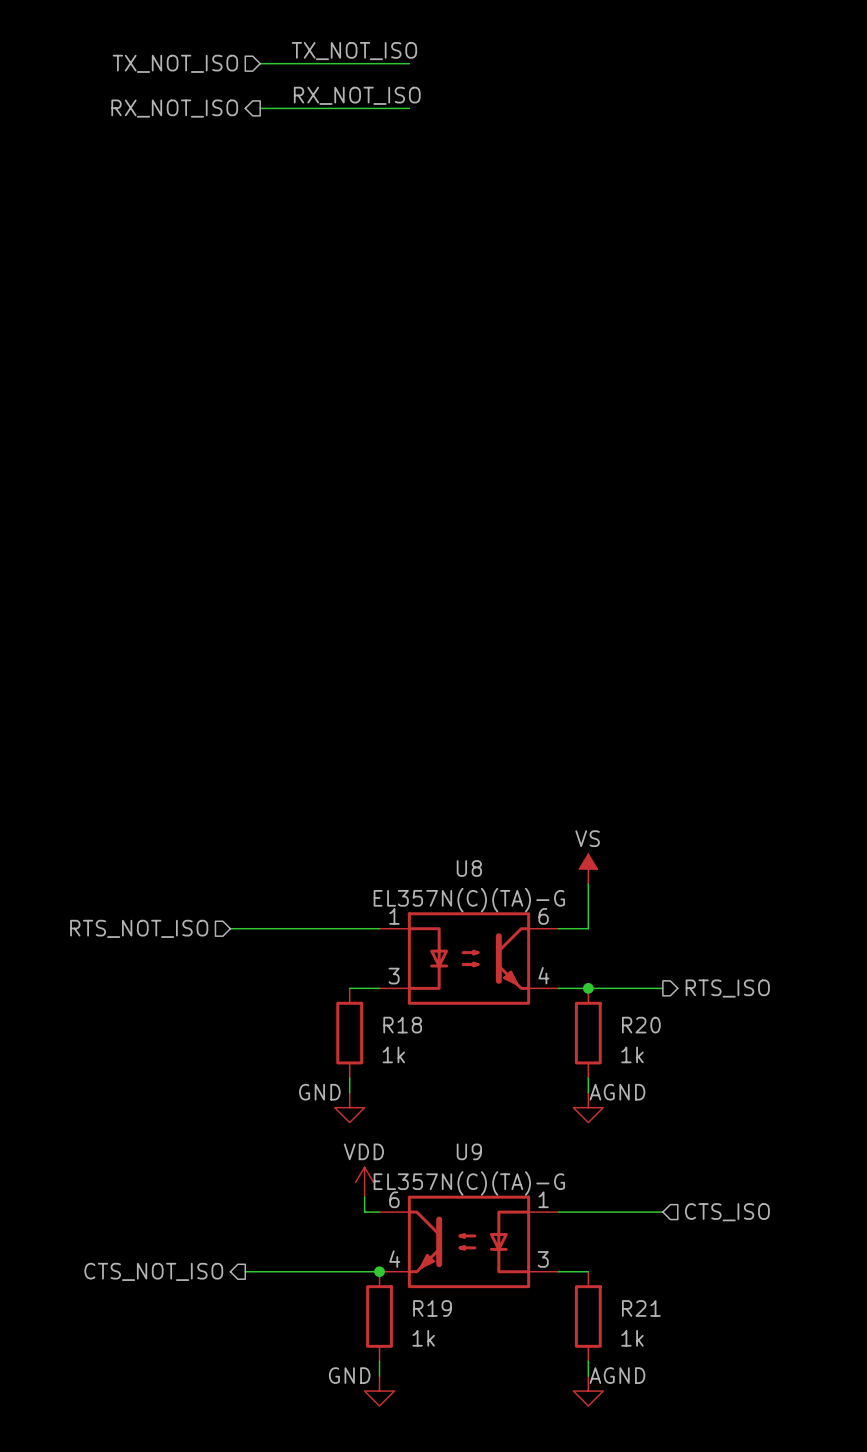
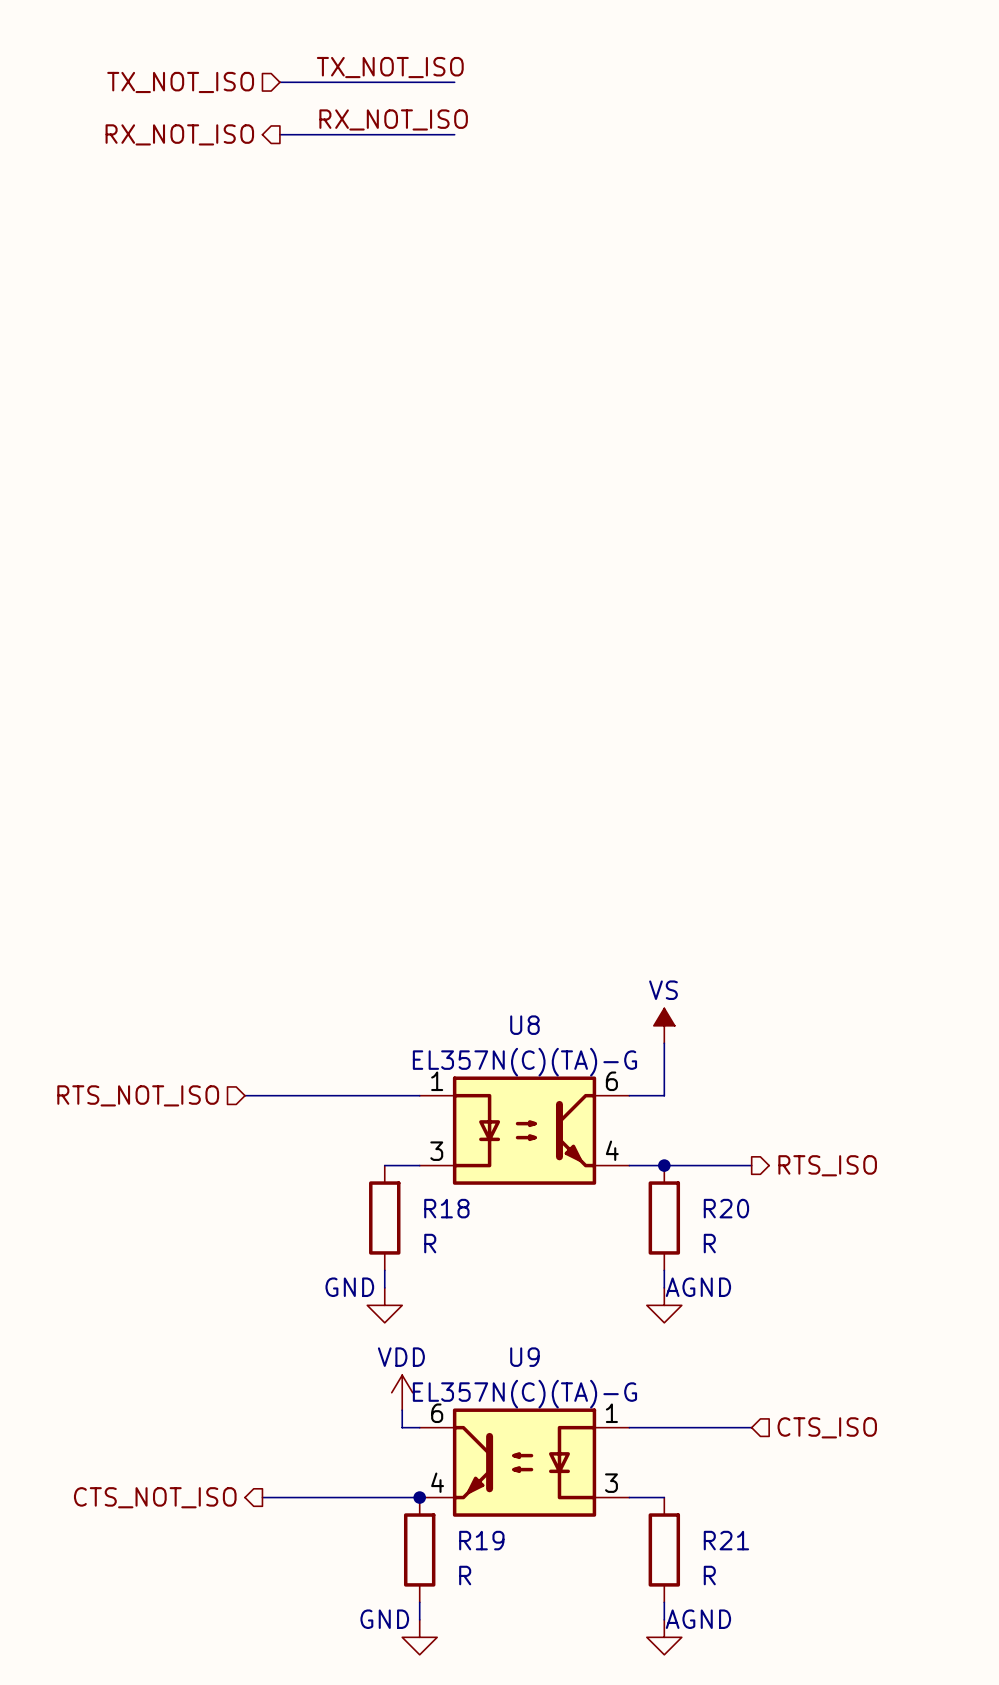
R18 value: 1k (393, 1054) -> R (430, 1243)
R20 value: 1k (632, 1054) -> R (709, 1243)
R19 value: 1k (423, 1338) -> R (465, 1575)
R21 value: 1k (632, 1338) -> R (709, 1575)

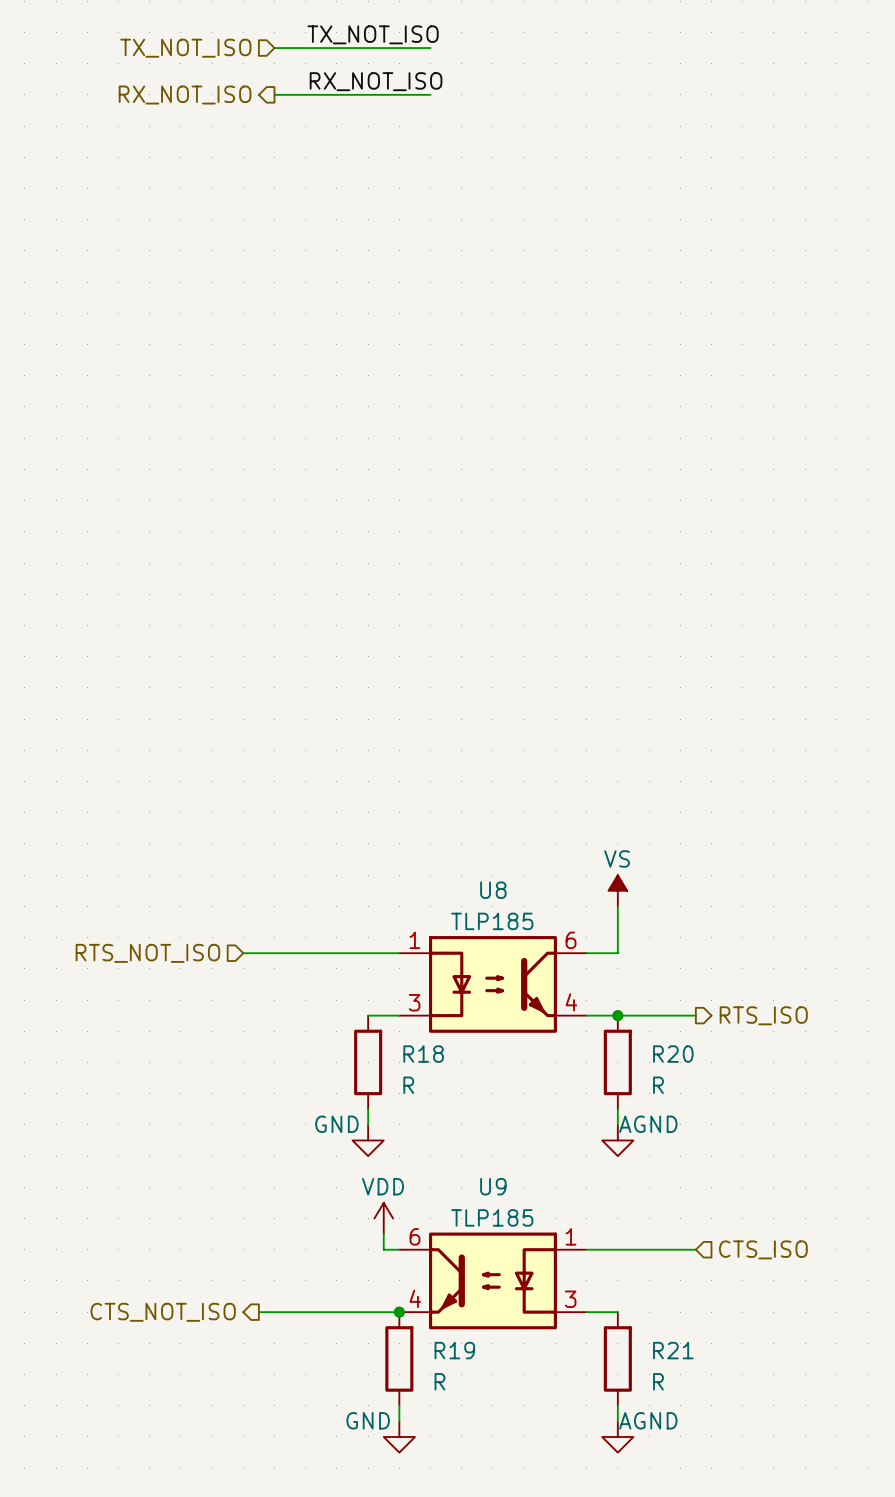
U8 value: EL357N(C)(TA)-G (524, 1062) -> TLP185 (492, 921)
U9 value: EL357N(C)(TA)-G (524, 1394) -> TLP185 (492, 1217)

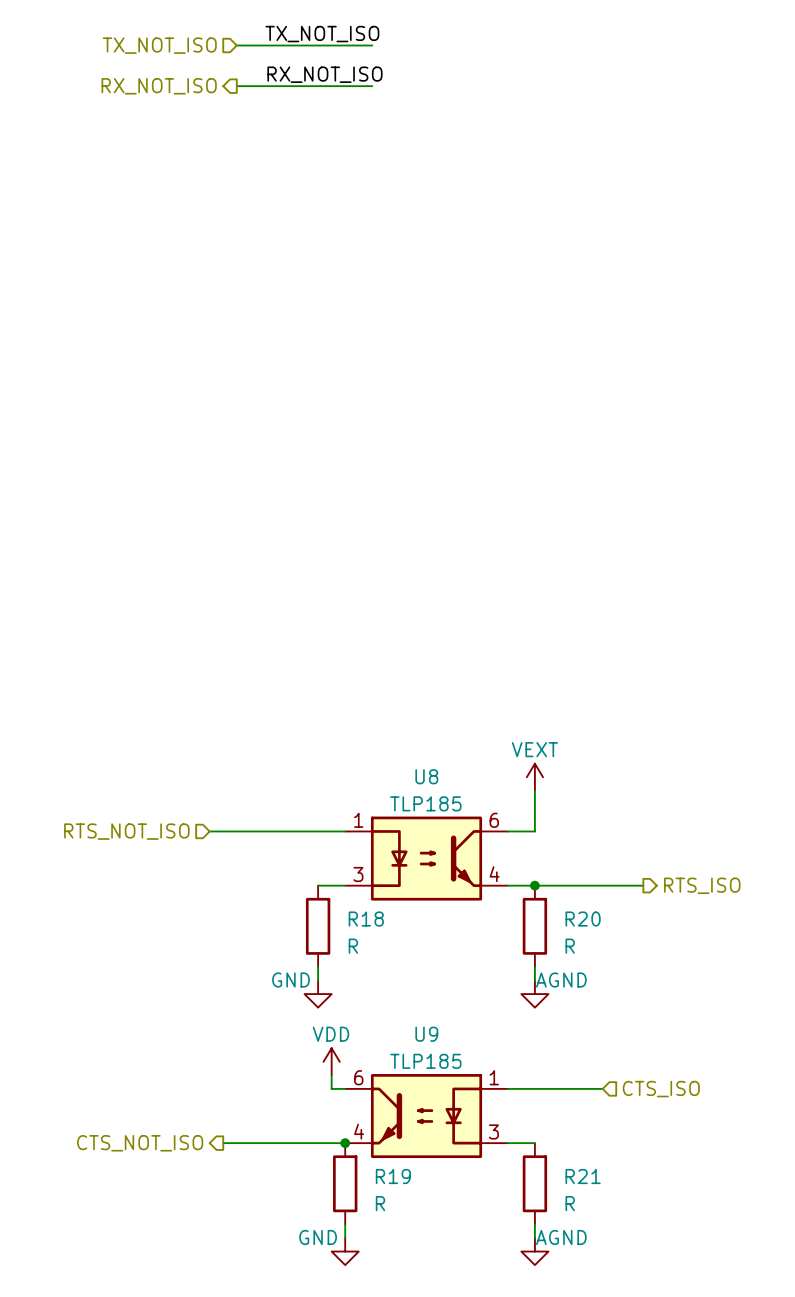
power symbol: VS (617, 890) -> VEXT (534, 777)
wire: none -> (602, 885) (643, 885)
hierarchical label position: RTS_ISO (763, 1015) -> RTS_ISO (702, 885)

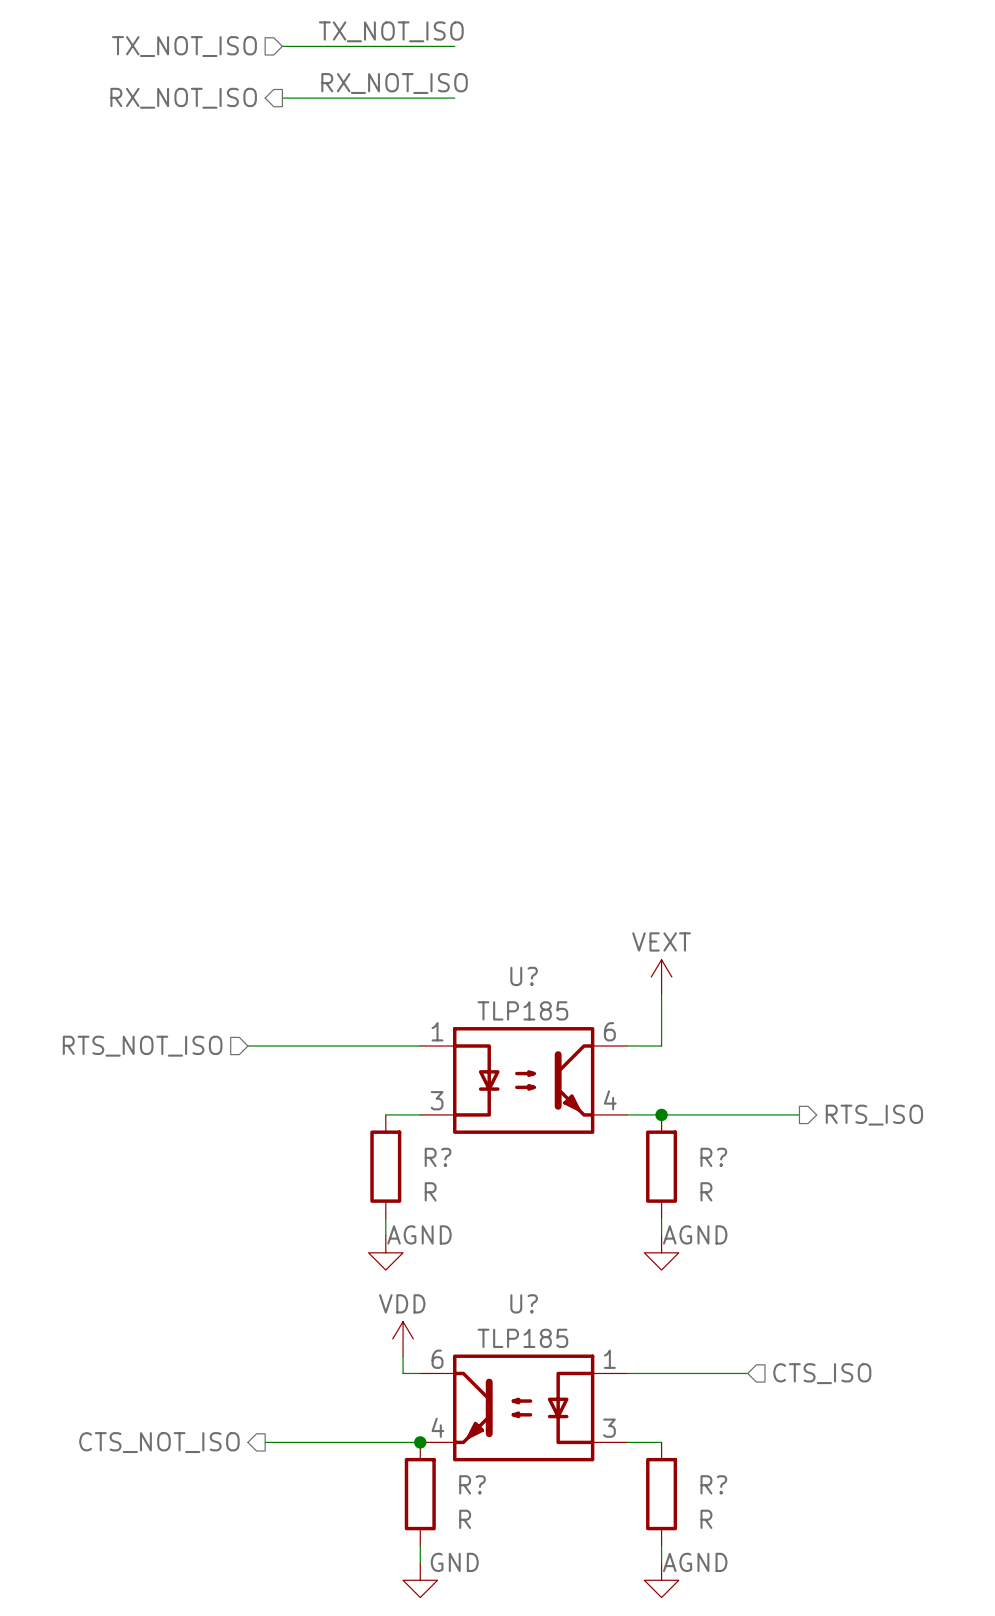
U8 name: U8 (426, 776) -> U? (524, 976)
R18 name: R18 (366, 919) -> R? (438, 1157)
R20 name: R20 (583, 919) -> R? (713, 1157)
power symbol: GND (318, 994) -> AGND (385, 1252)
U9 name: U9 (426, 1034) -> U? (524, 1303)
R19 name: R19 (393, 1176) -> R? (472, 1484)
R21 name: R21 (583, 1176) -> R? (713, 1484)
power symbol text position: GND (318, 1237) -> GND (454, 1562)

